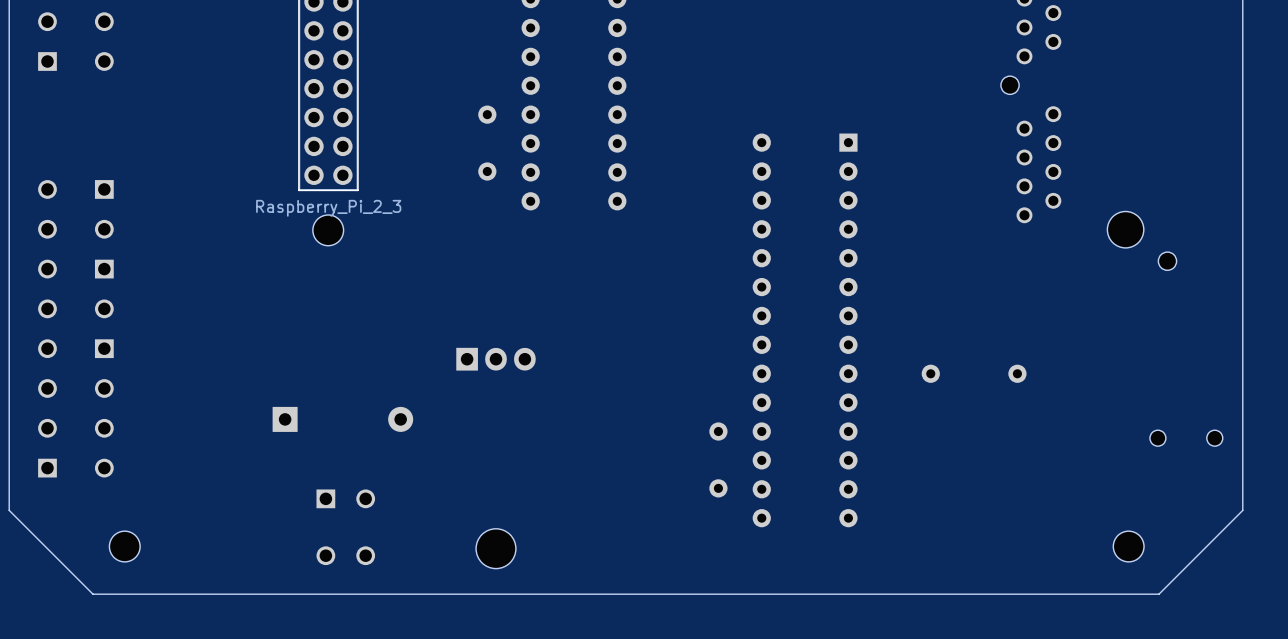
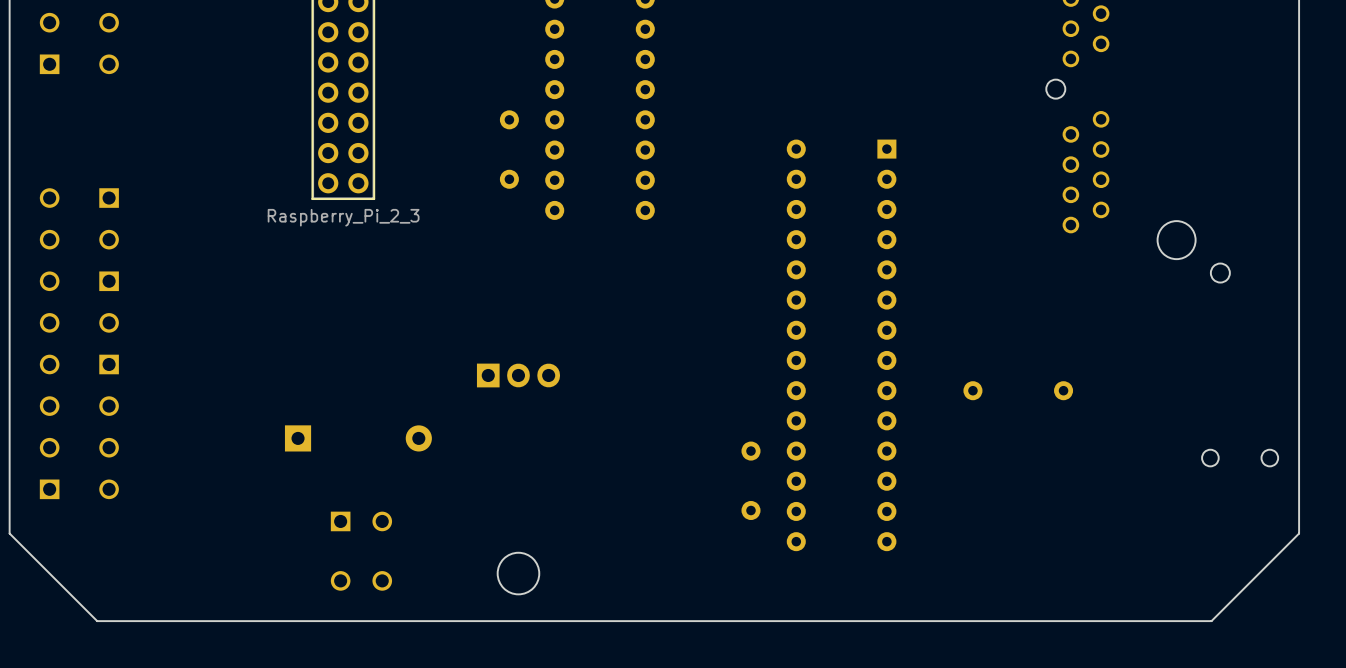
part: (328, 230) -> none
part: (124, 546) -> none
part: (1128, 546) -> none

